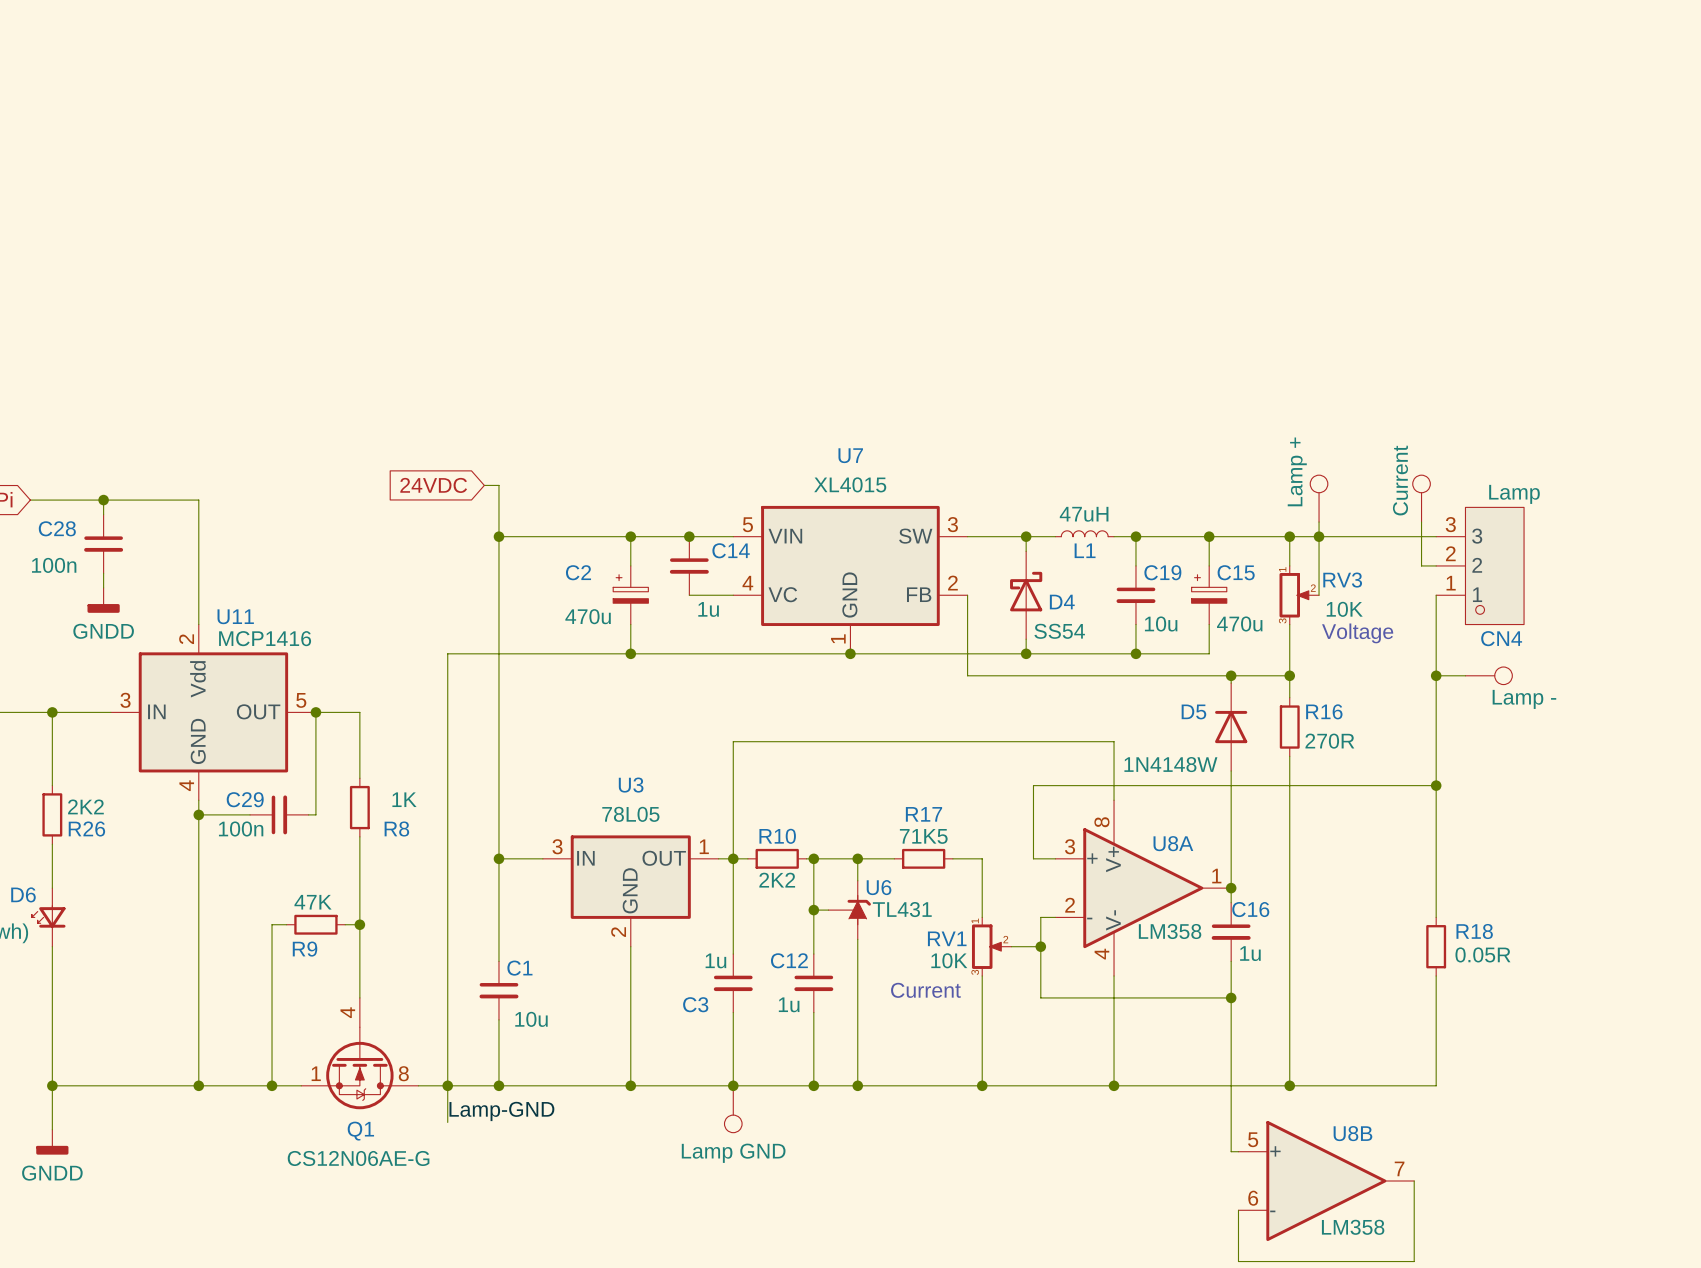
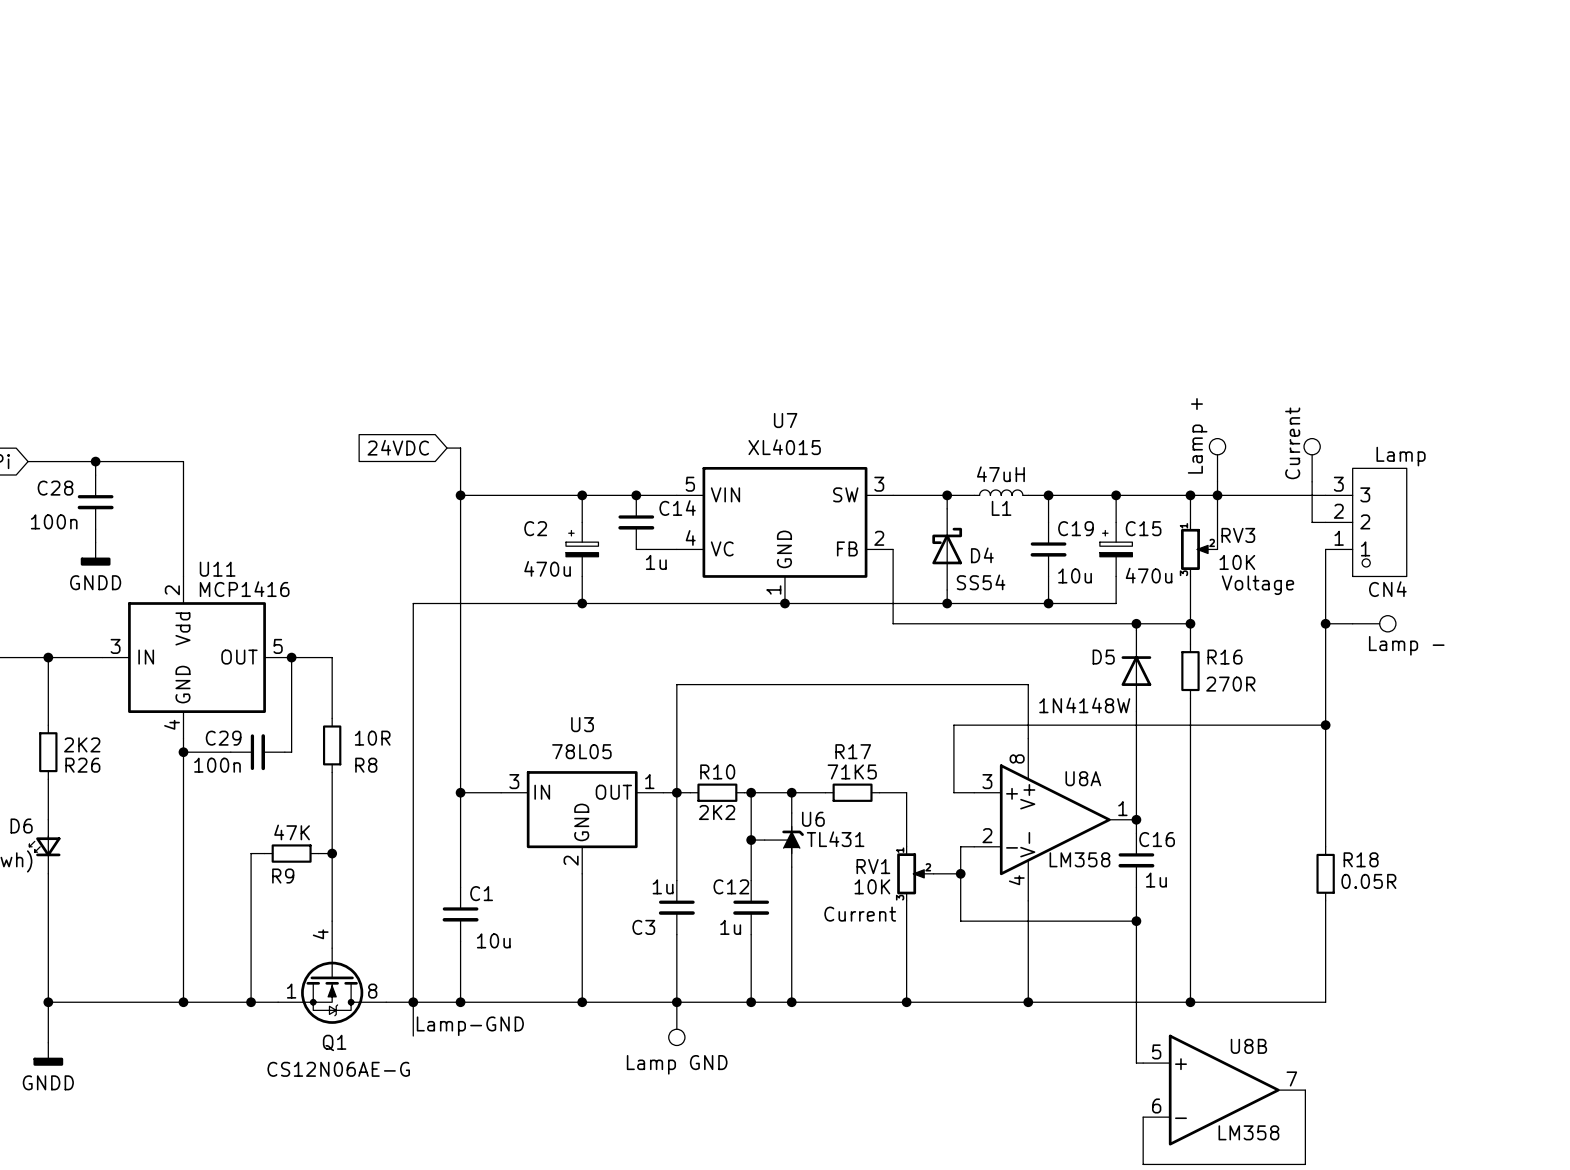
R8 value: 1K (404, 799) -> 10R (372, 738)

